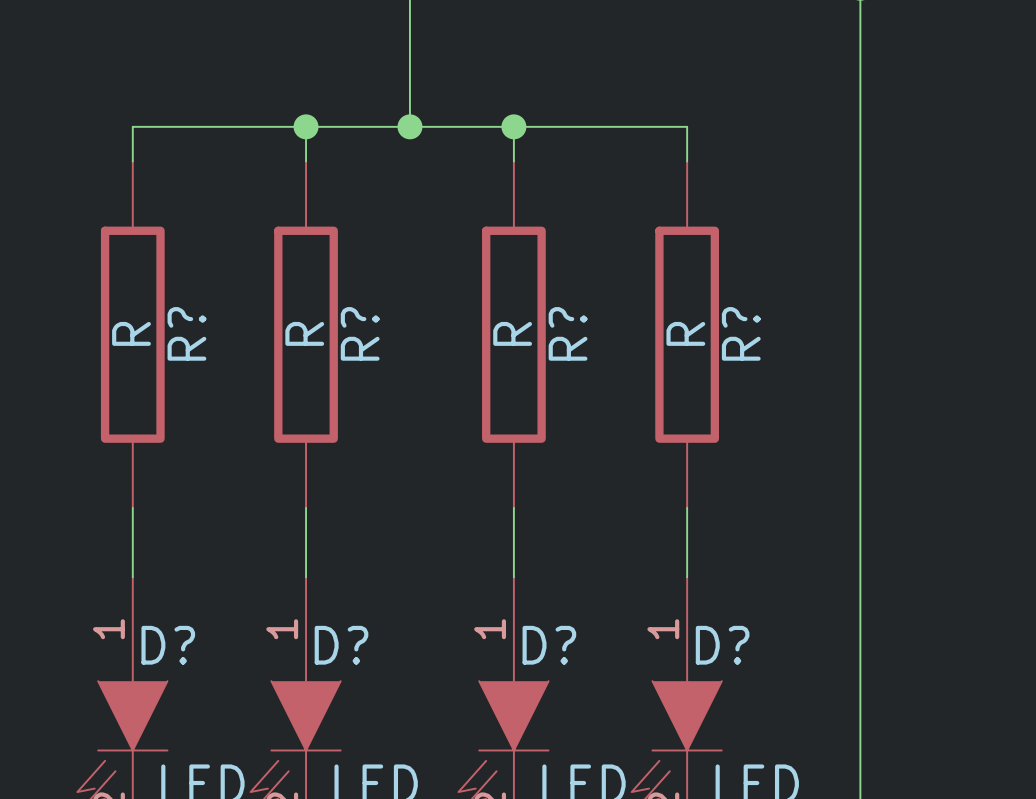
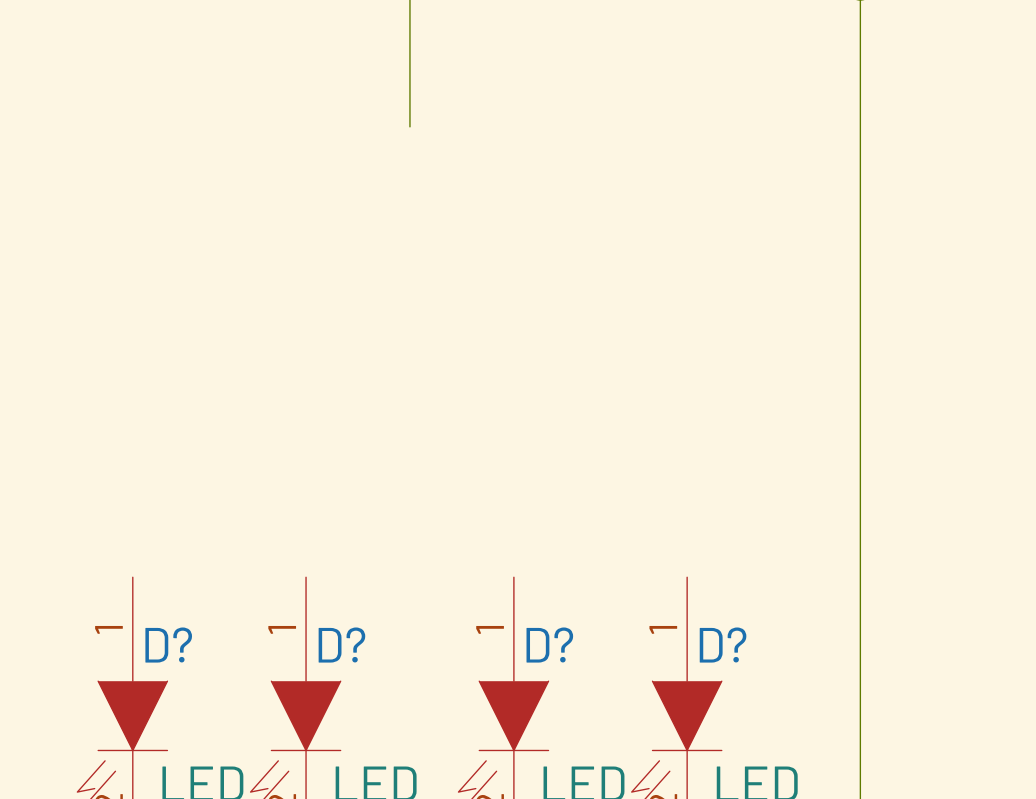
wire: (306, 126) (306, 161) -> none
junction: (306, 126) -> none
junction: (409, 126) -> none
wire: (513, 126) (513, 161) -> none
junction: (513, 126) -> none
wire: (132, 161) (132, 126) (687, 126) (687, 161) -> none
R?: R (132, 334) -> none
R?: R (306, 334) -> none
R?: R (513, 334) -> none
R?: R (687, 334) -> none
wire: (132, 507) (132, 577) -> none
wire: (306, 507) (306, 577) -> none
wire: (513, 507) (513, 577) -> none
wire: (687, 507) (687, 577) -> none

